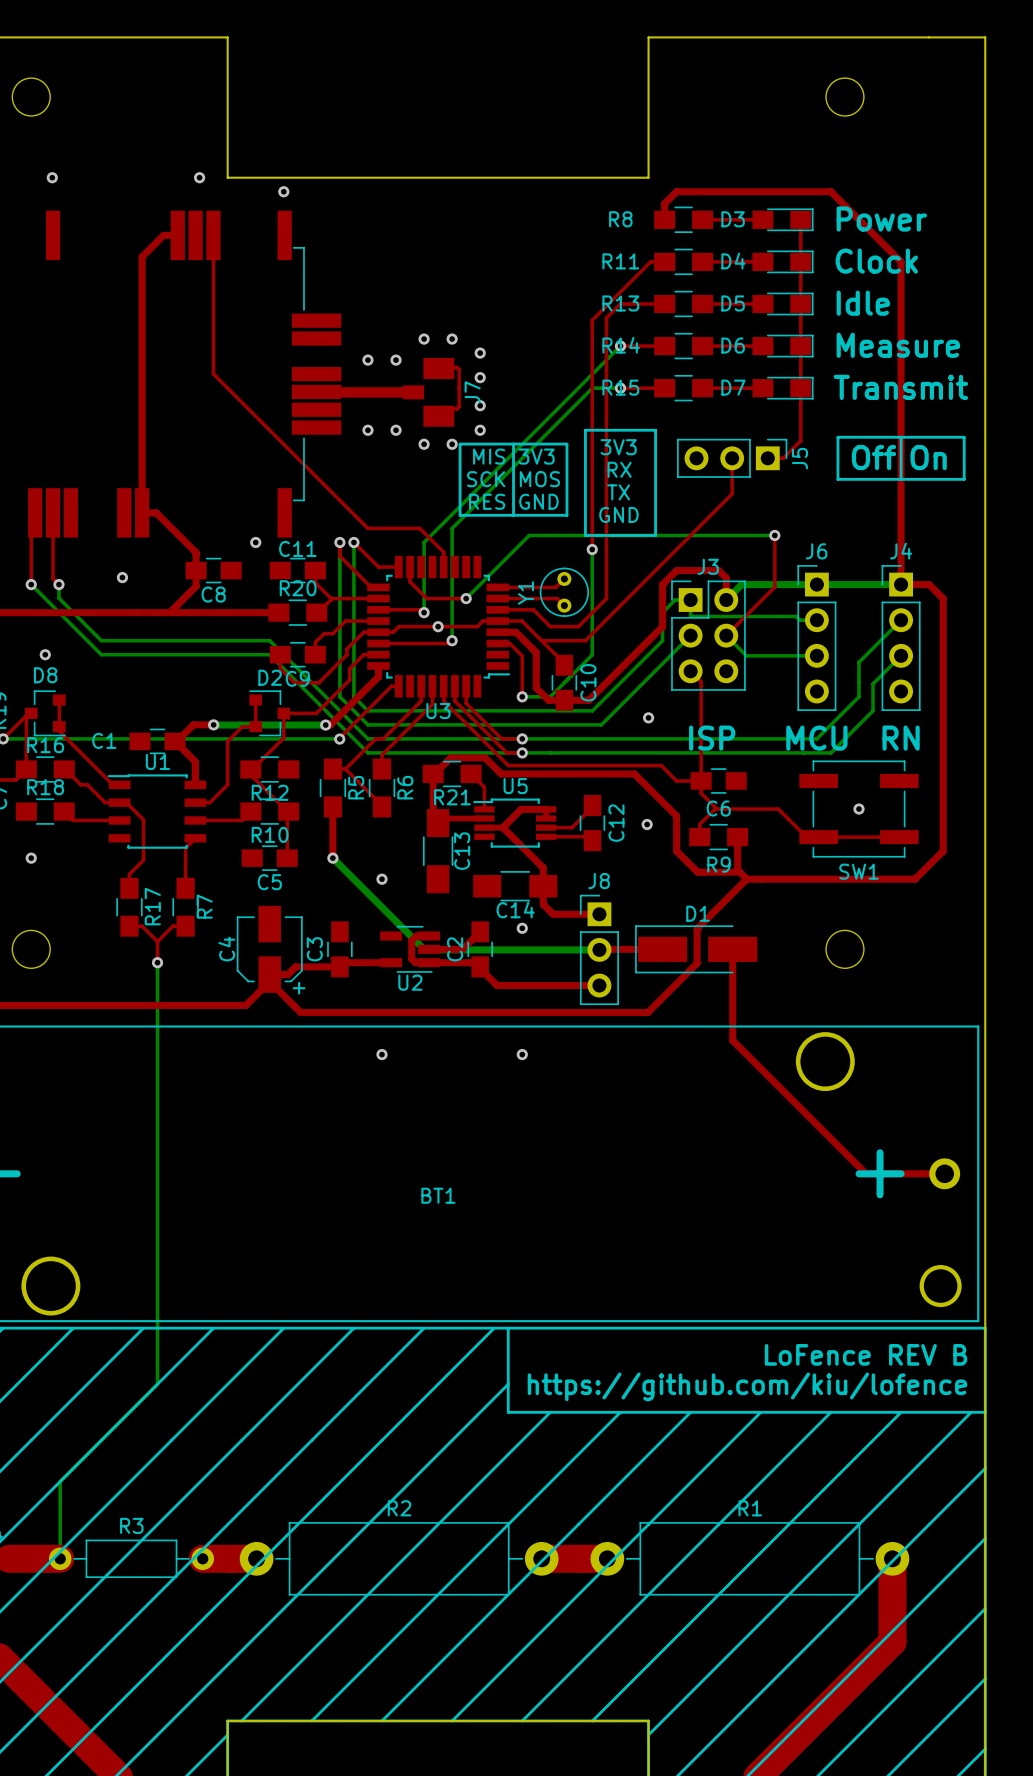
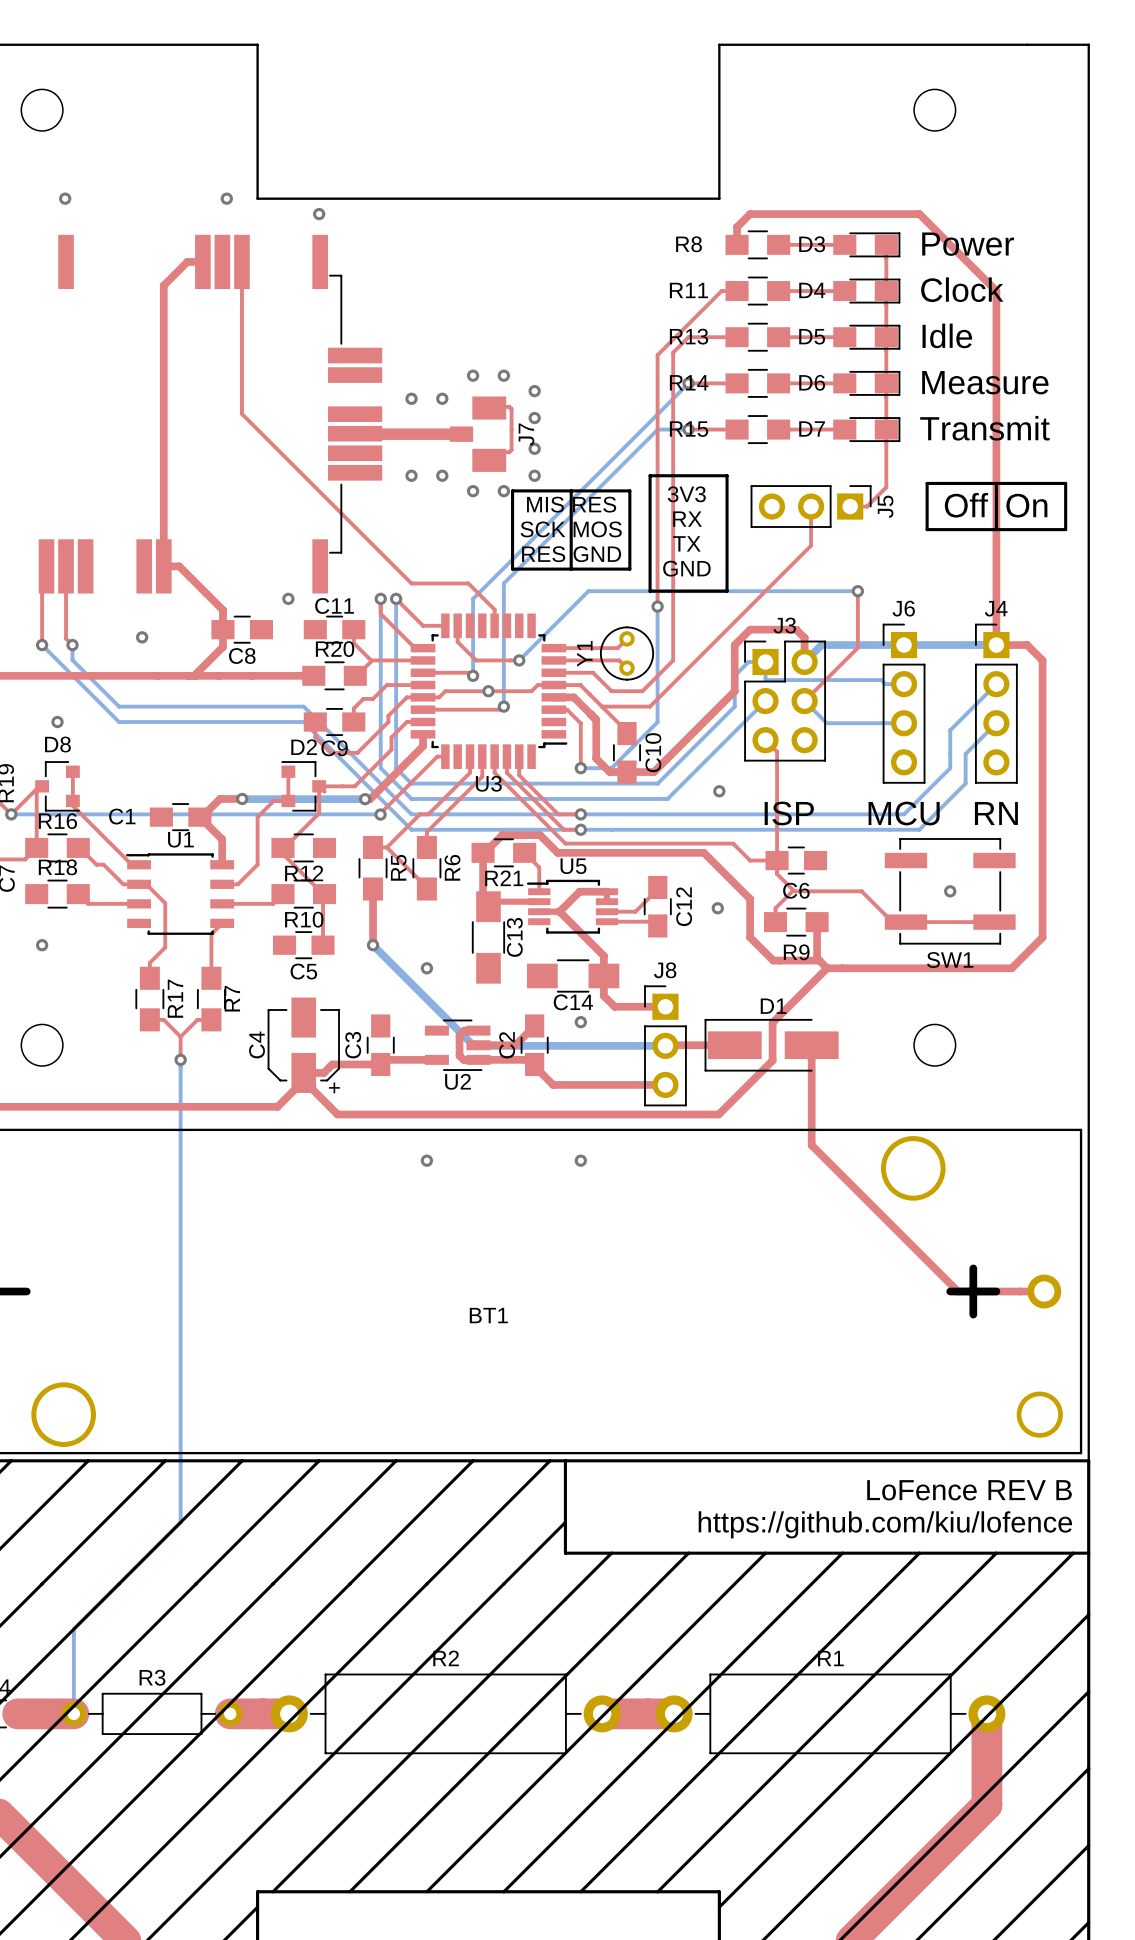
text: MIS 3V3 (513, 456) -> MIS RES (571, 504)

